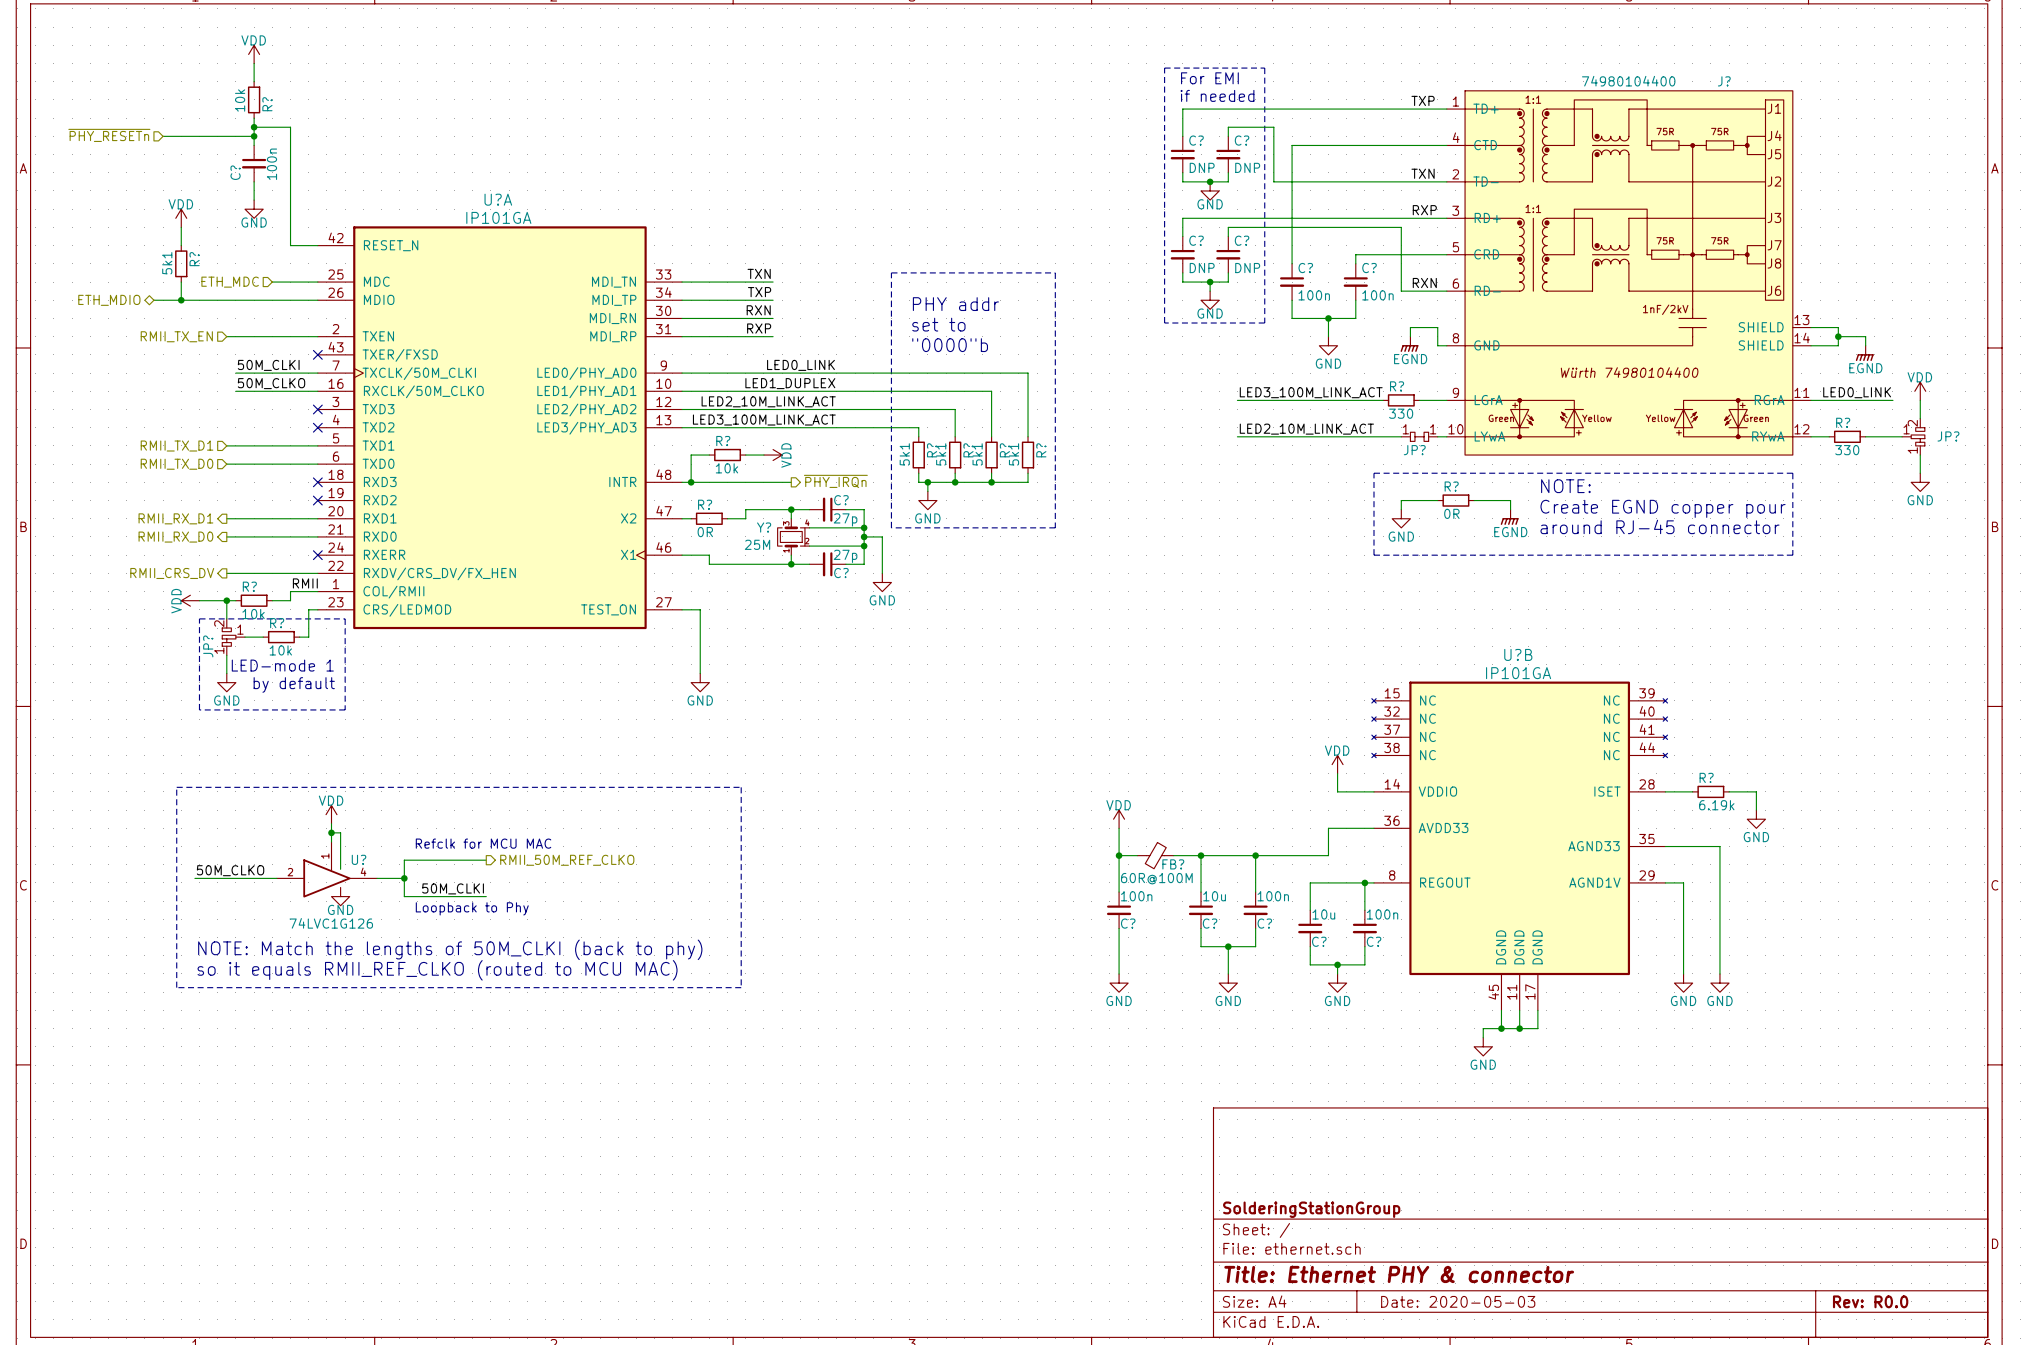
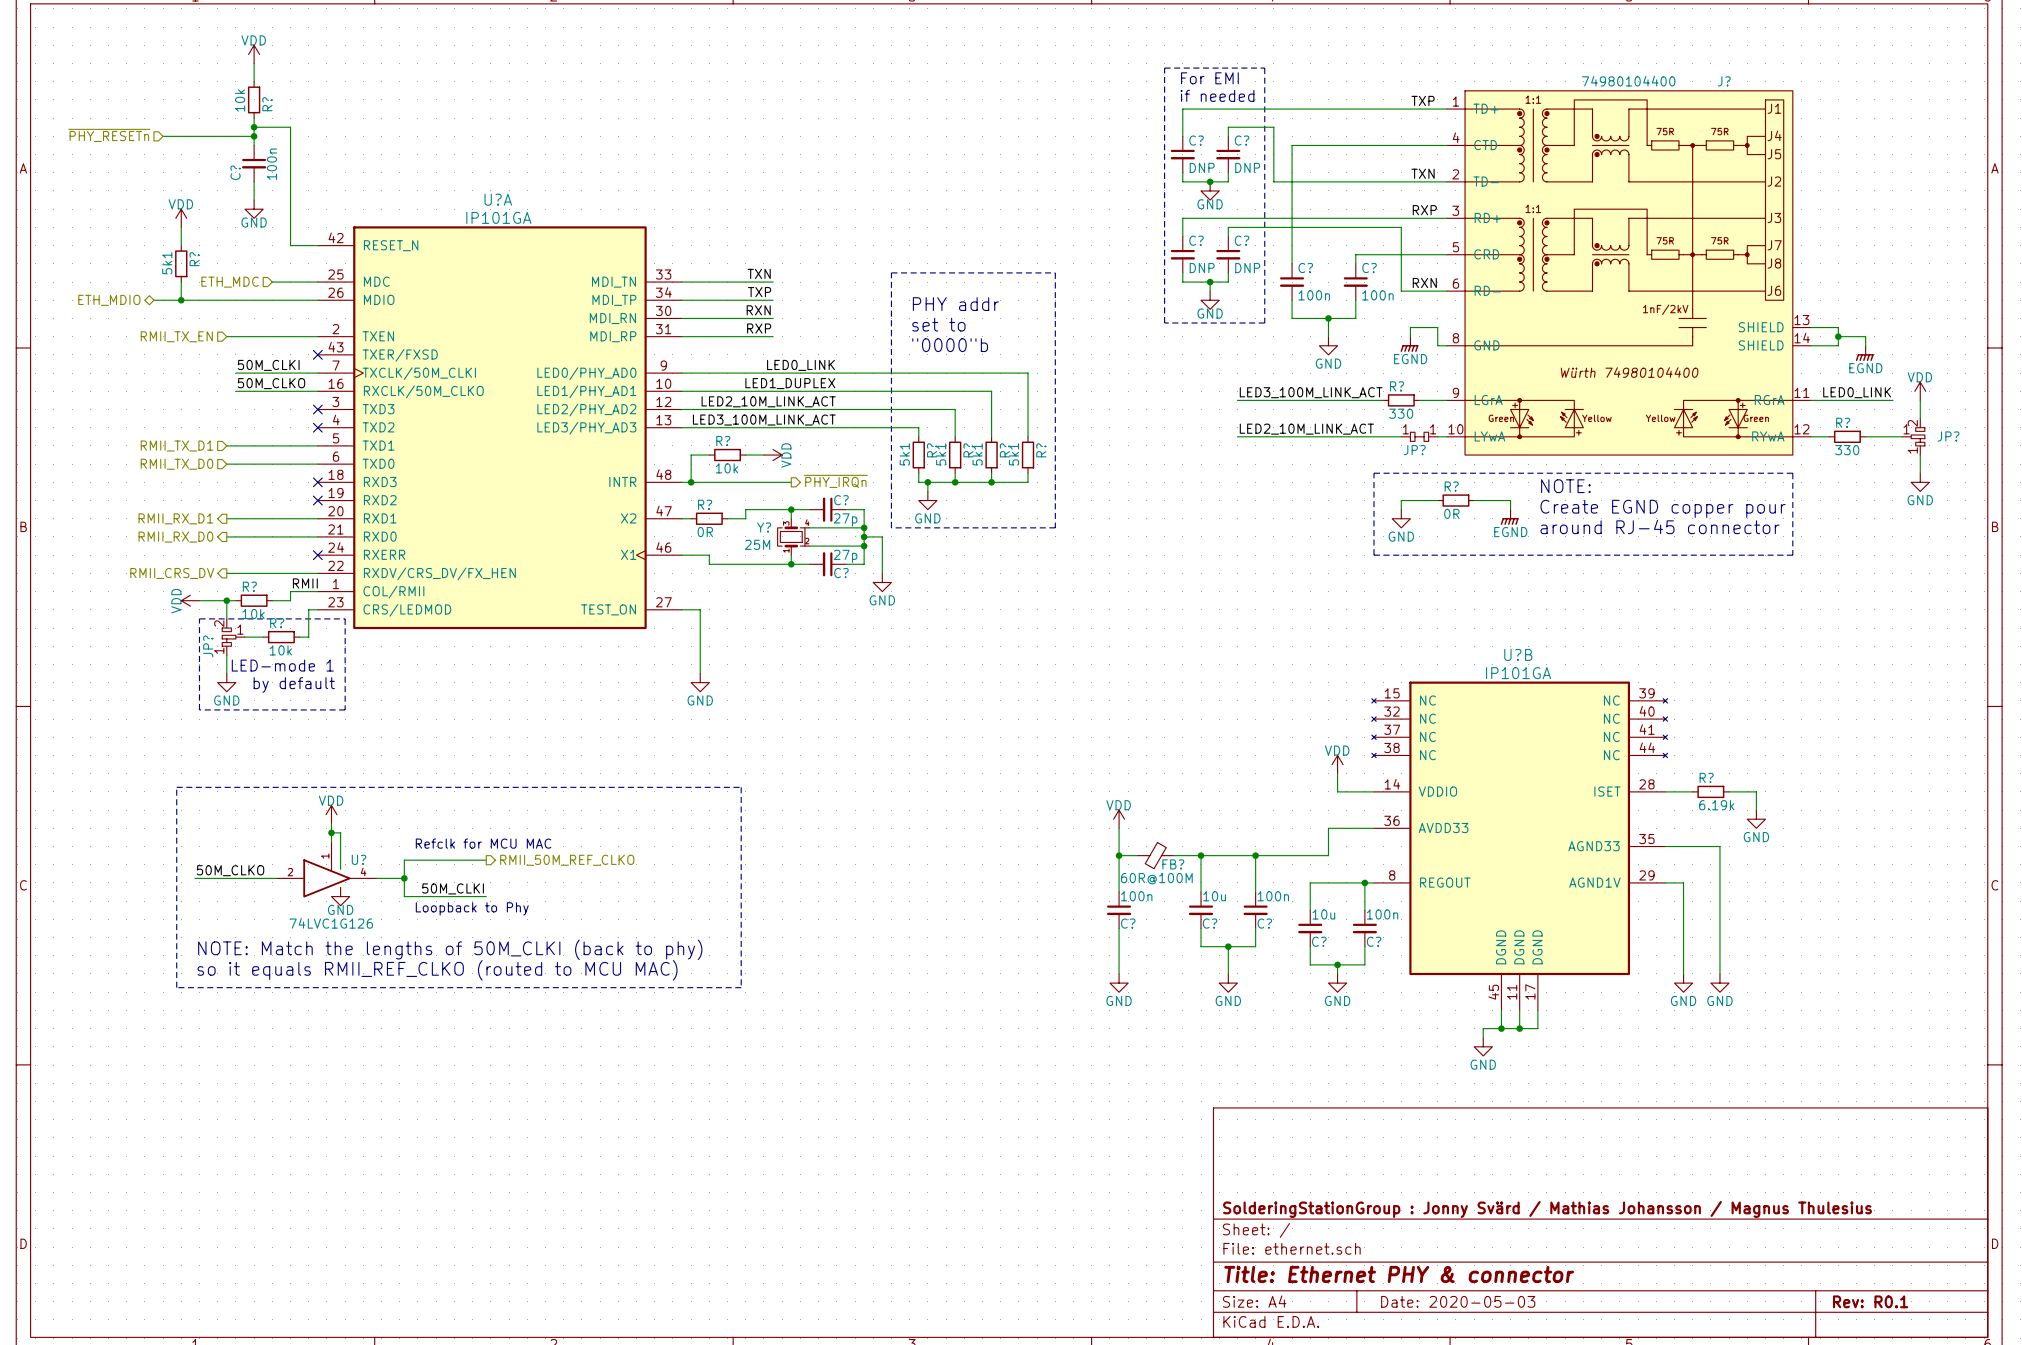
title block: SolderingStationGroup (1311, 1209) -> SolderingStationGroup : Jonny Svärd / Mathias Johansson / Magnus Thulesius (1547, 1209)
title block: Rev: R0.0 (1870, 1301) -> Rev: R0.1 (1870, 1301)

